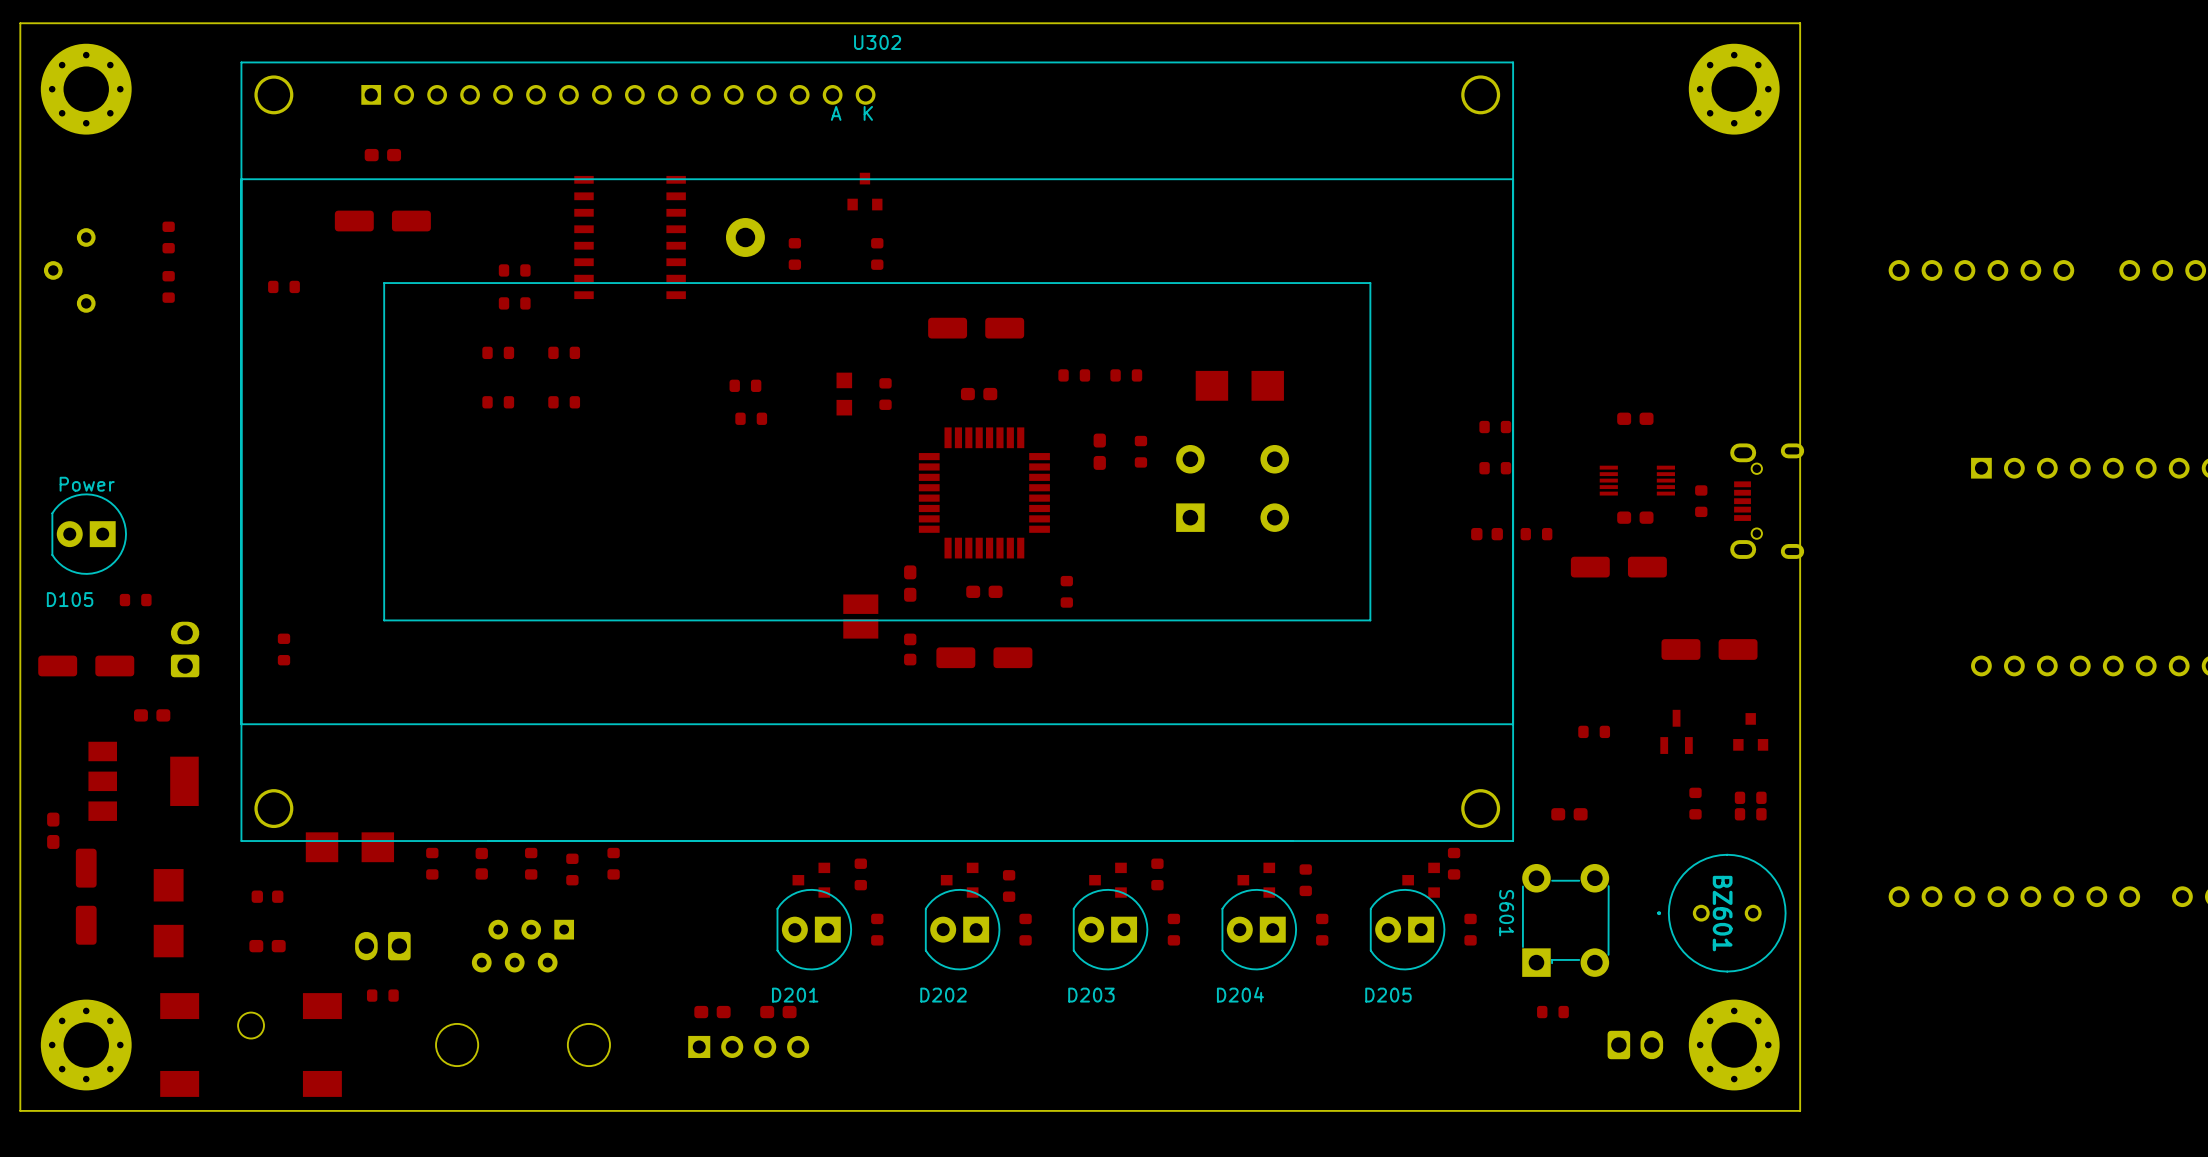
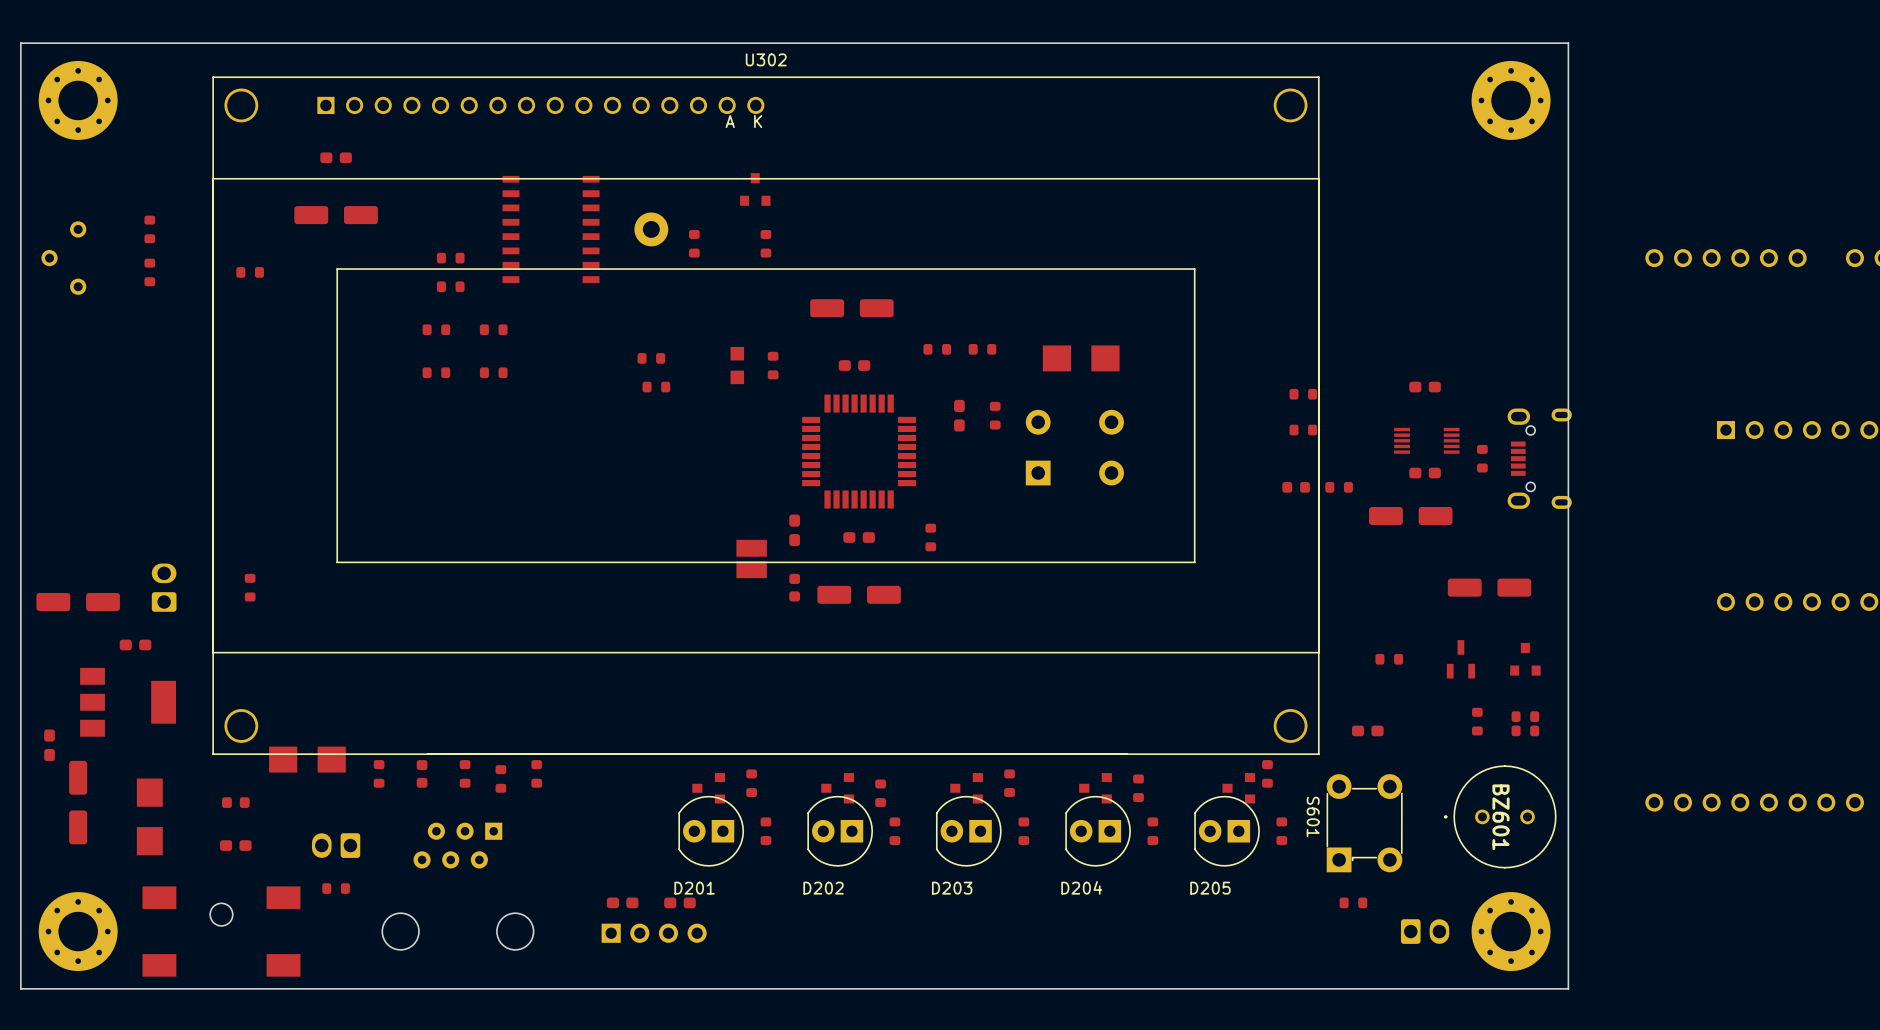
text: Power (87, 484) -> none
D105: (89, 534) -> none
part: (135, 600) -> none

